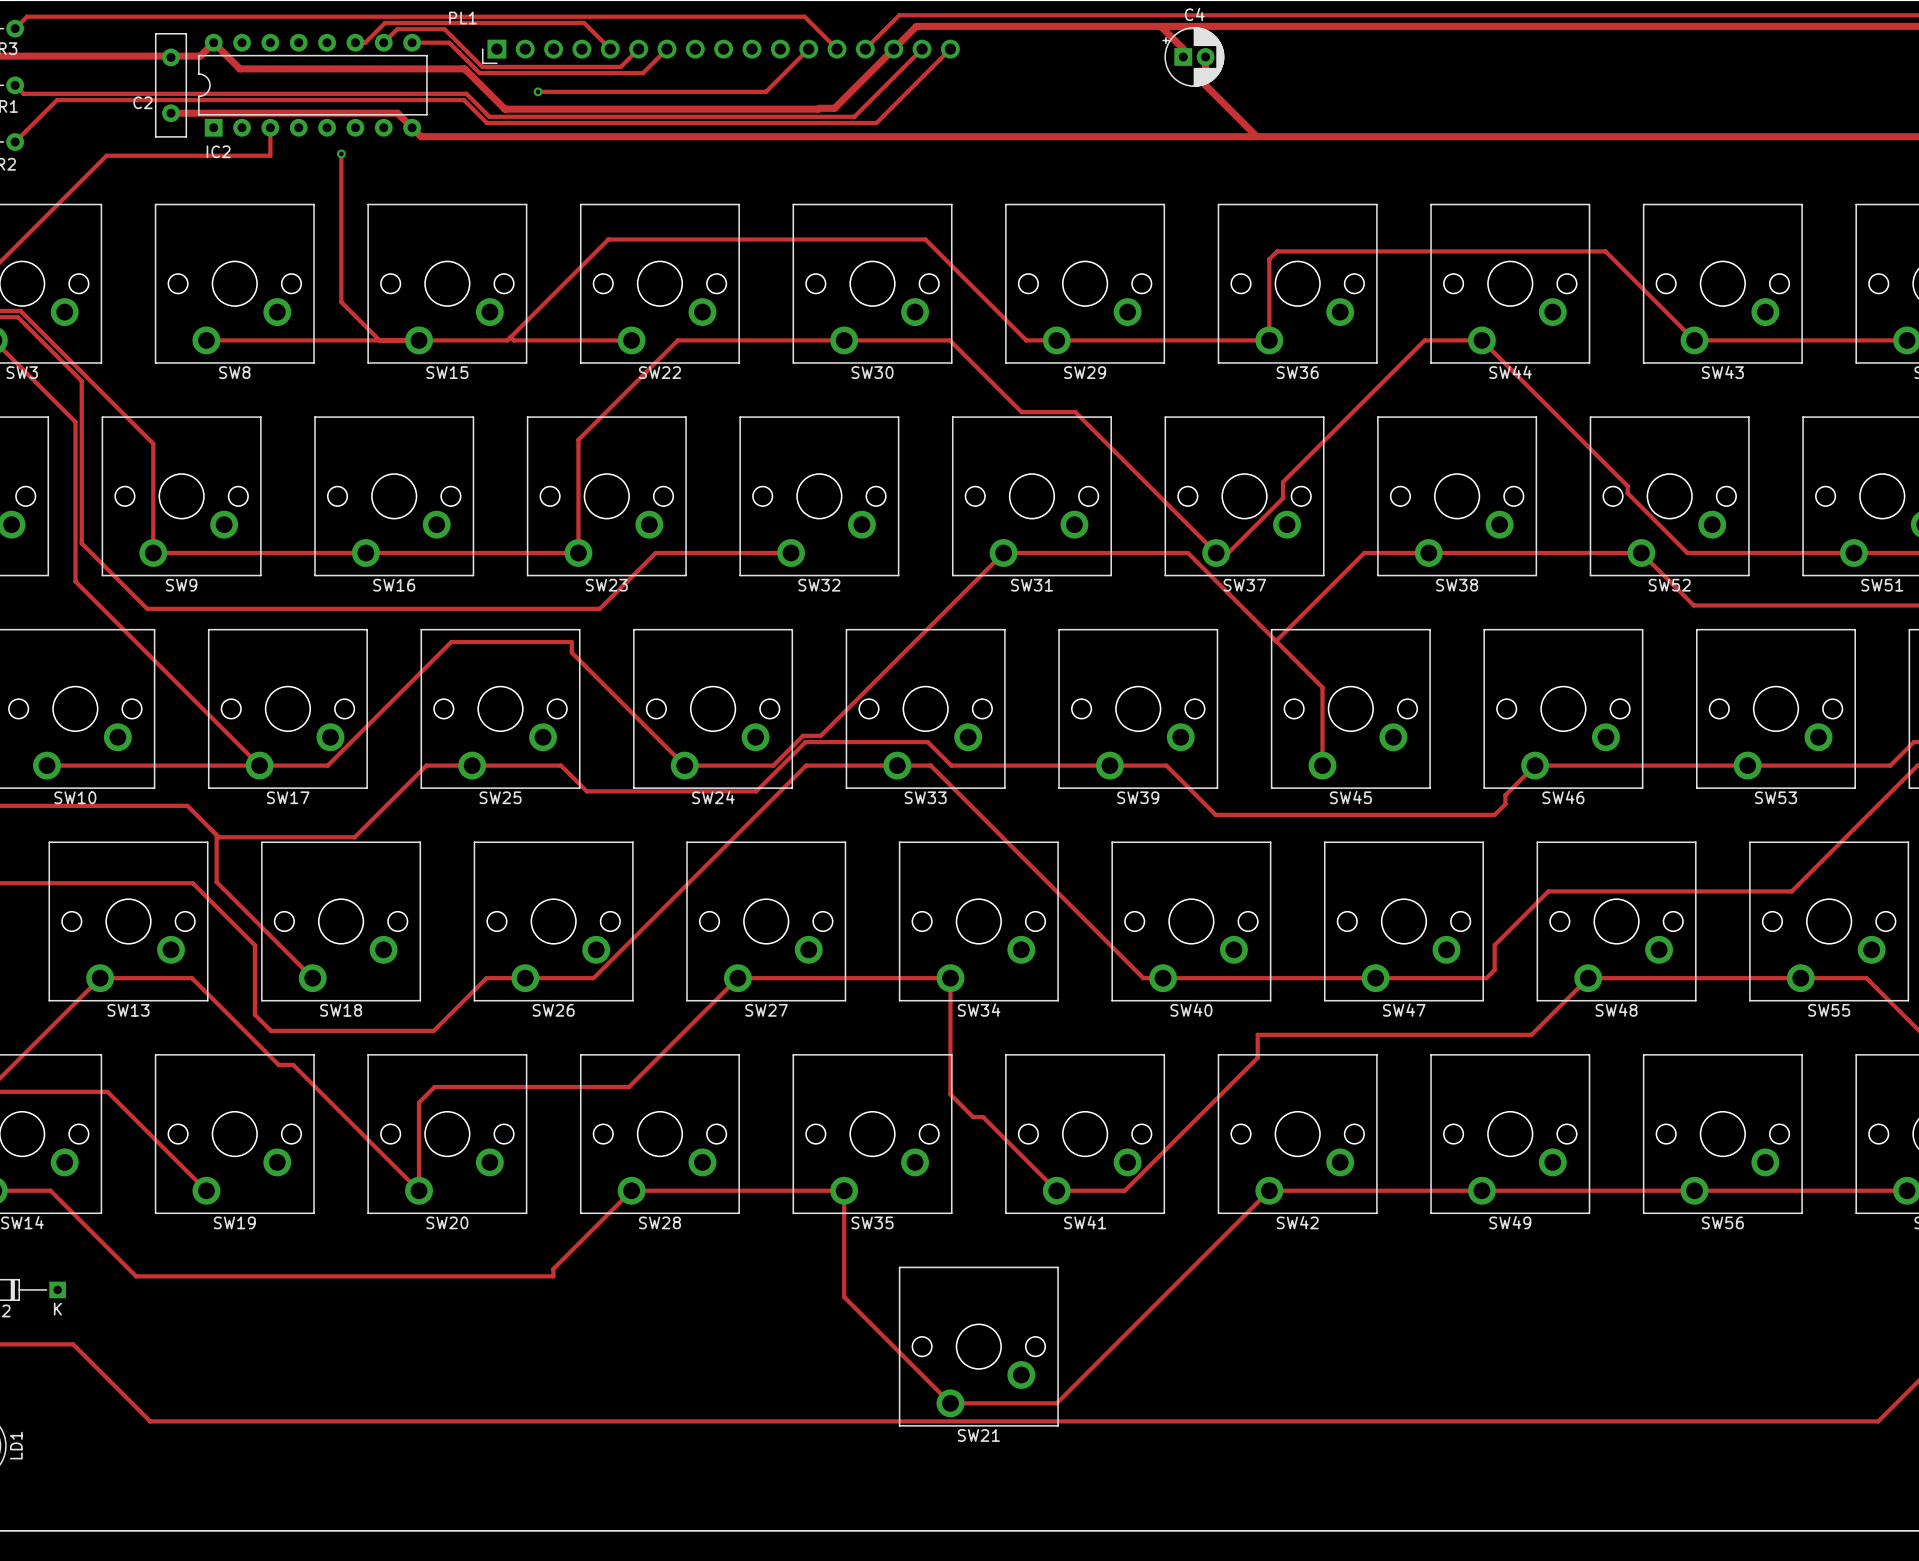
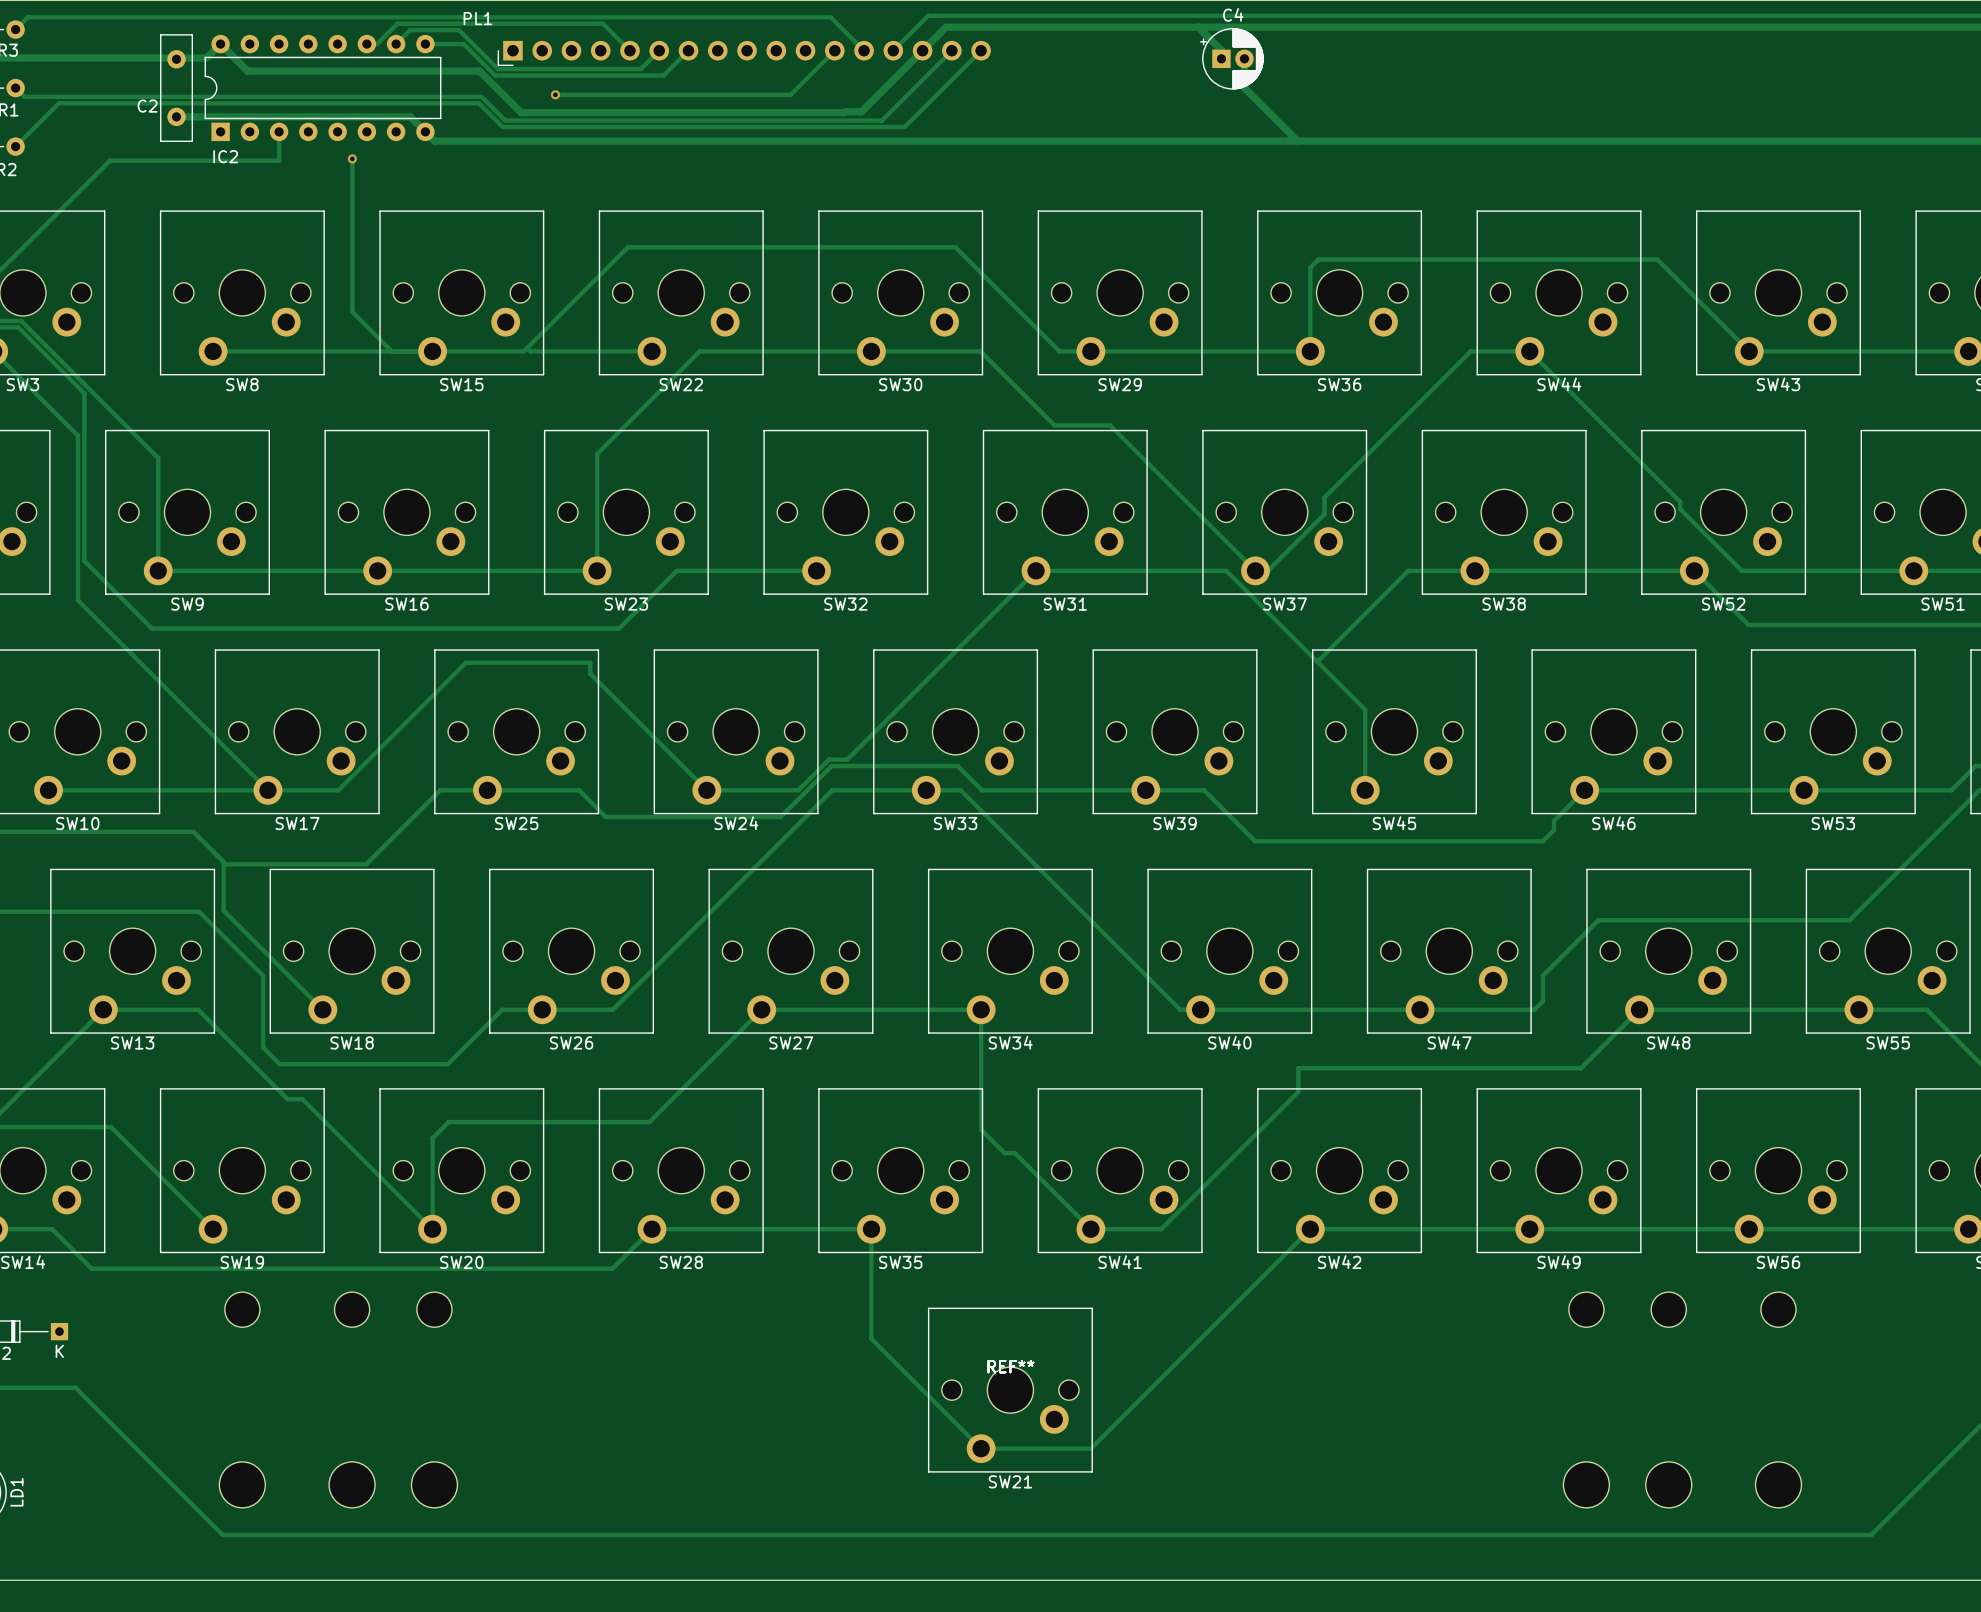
track: (88, 1229) (136, 1276) (553, 1276) (553, 1268) (593, 1229) -> (91, 1268) (612, 1268)
REF**: none -> (1010, 1399)
REF**: none -> (1010, 1399)
REF**: none -> (1010, 1399)
track: (150, 1421) (1878, 1421) -> (155, 1467) (222, 1534) (1871, 1534) (1938, 1467)

